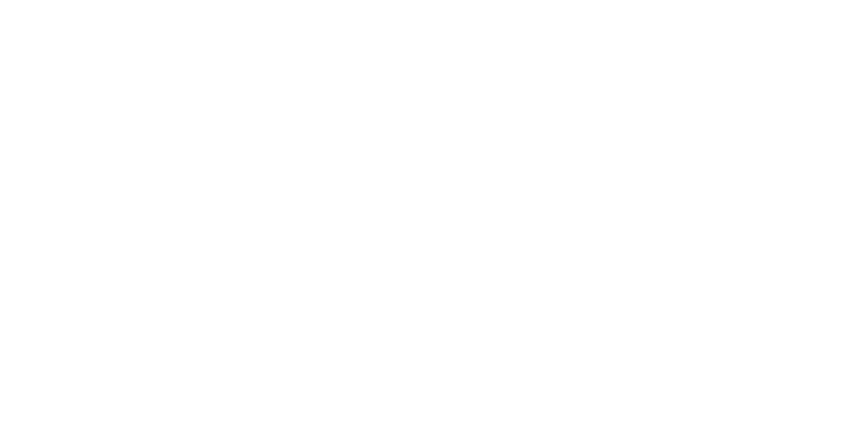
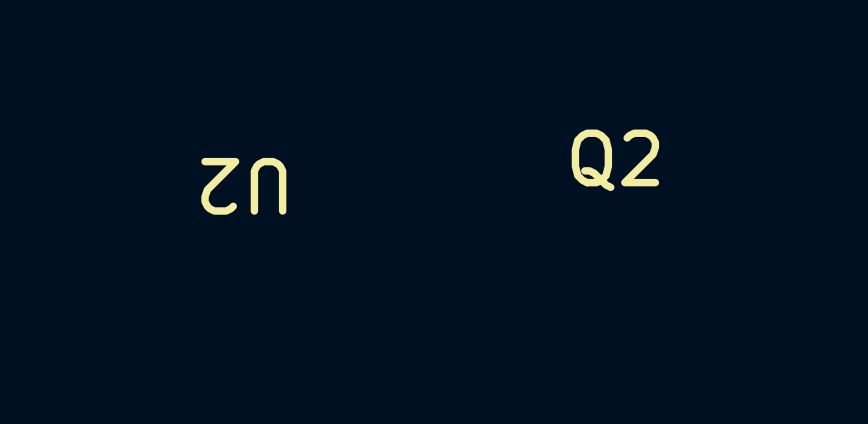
text: none -> Q2 (615, 160)
text: none -> U2 (243, 186)

